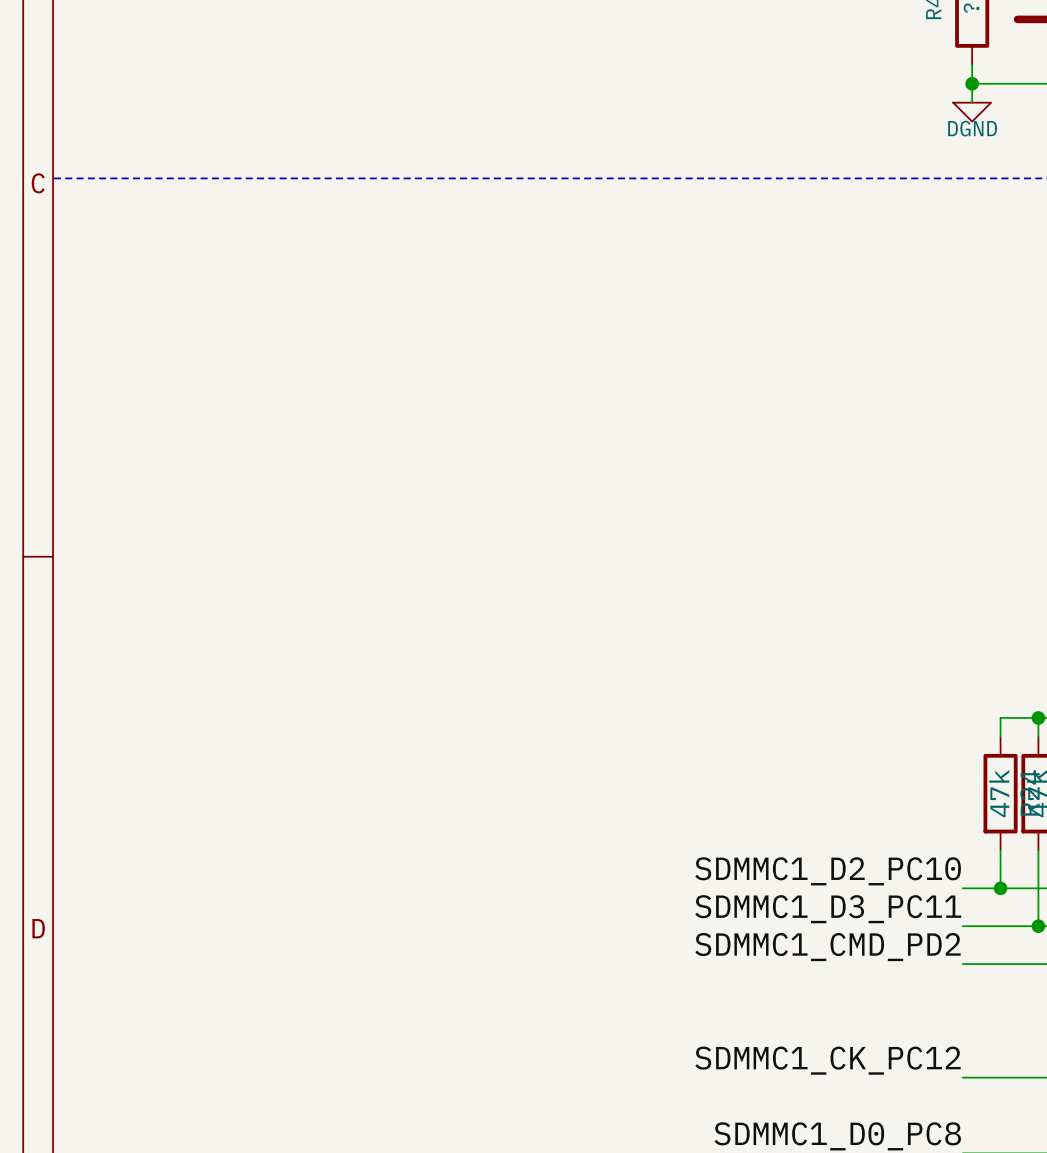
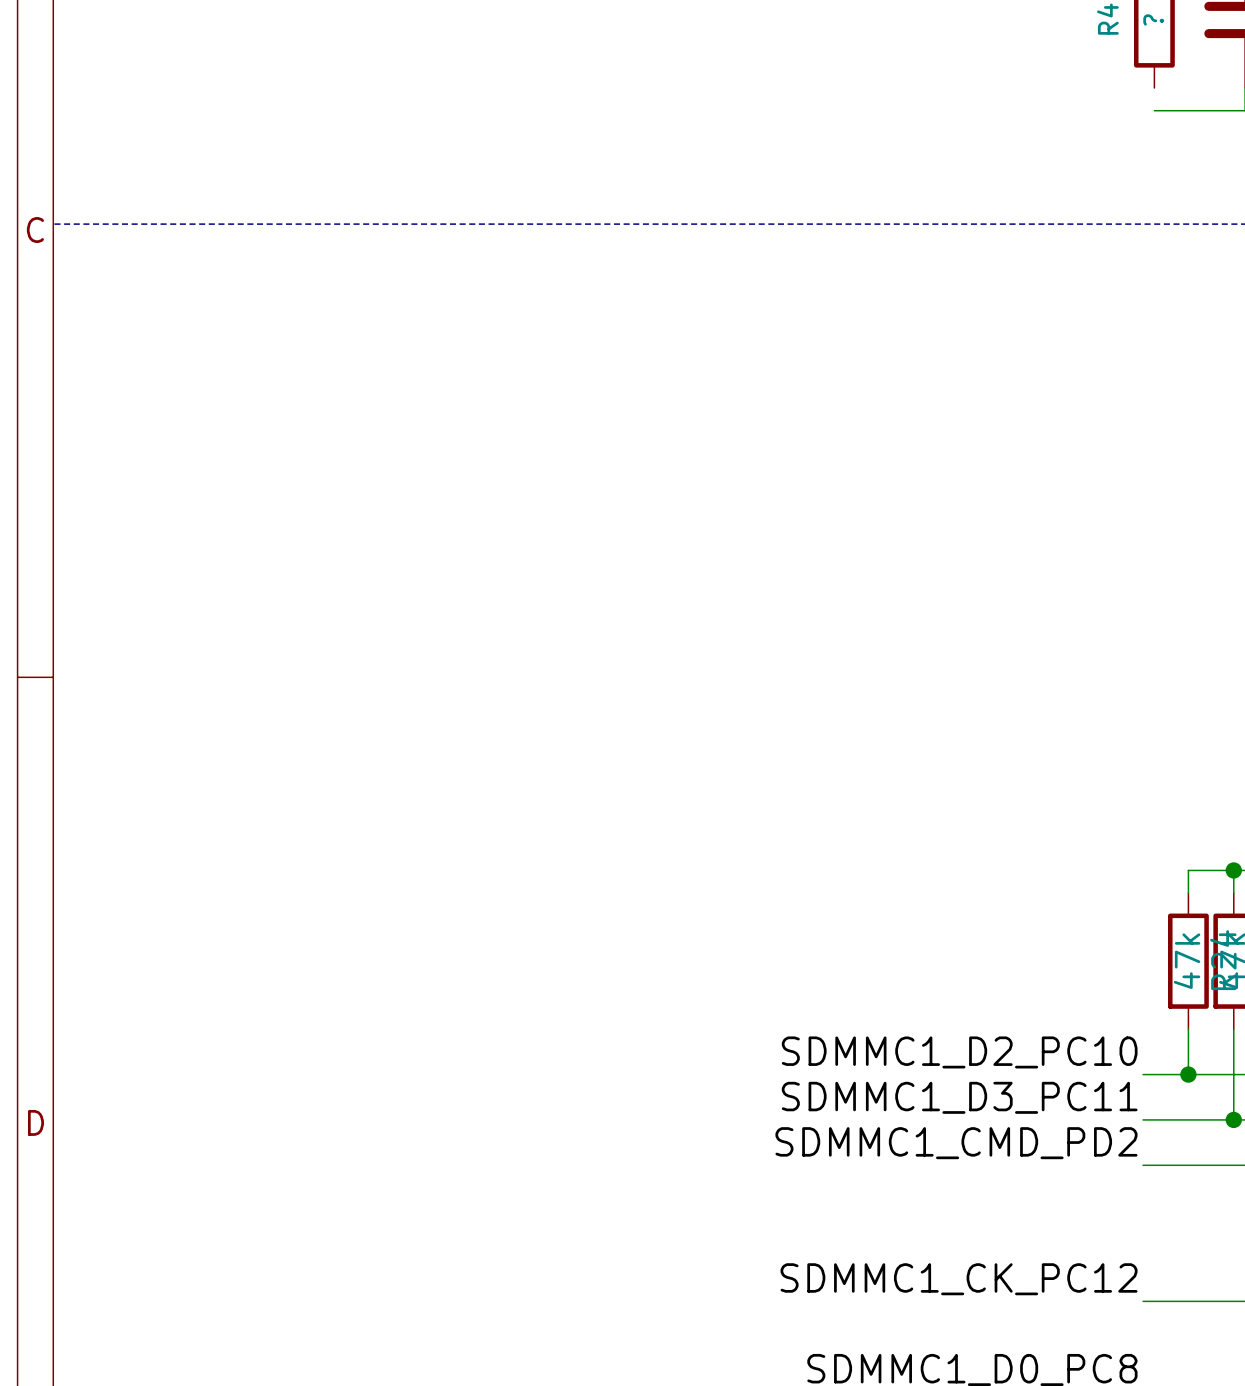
wire: (972, 64) (972, 102) -> none
junction: (972, 83) -> none
power symbol: DGND (972, 112) -> none

